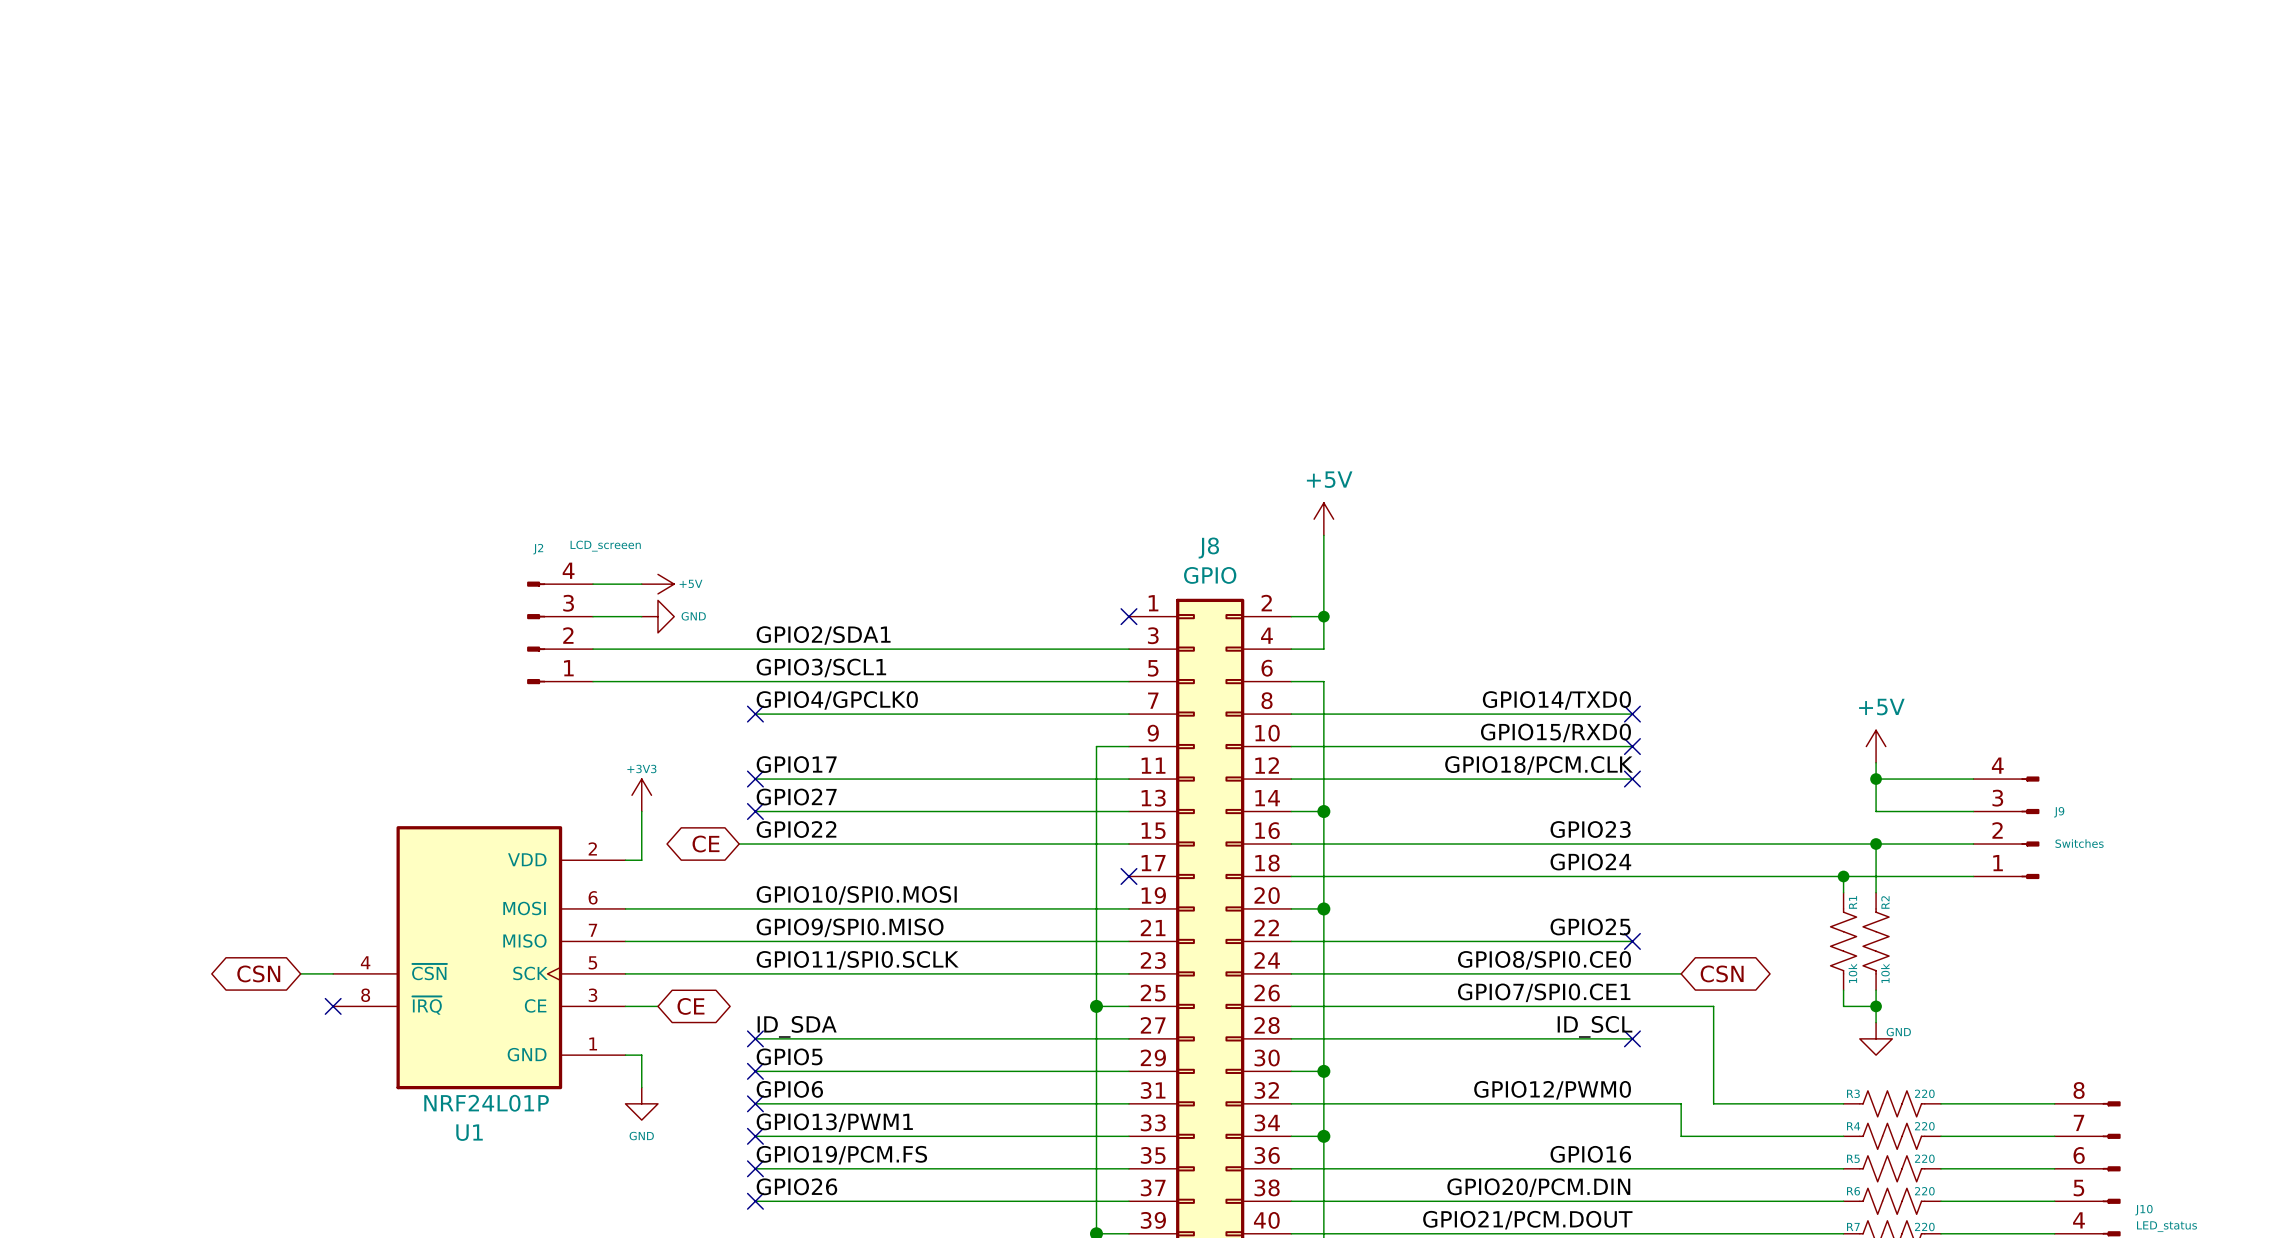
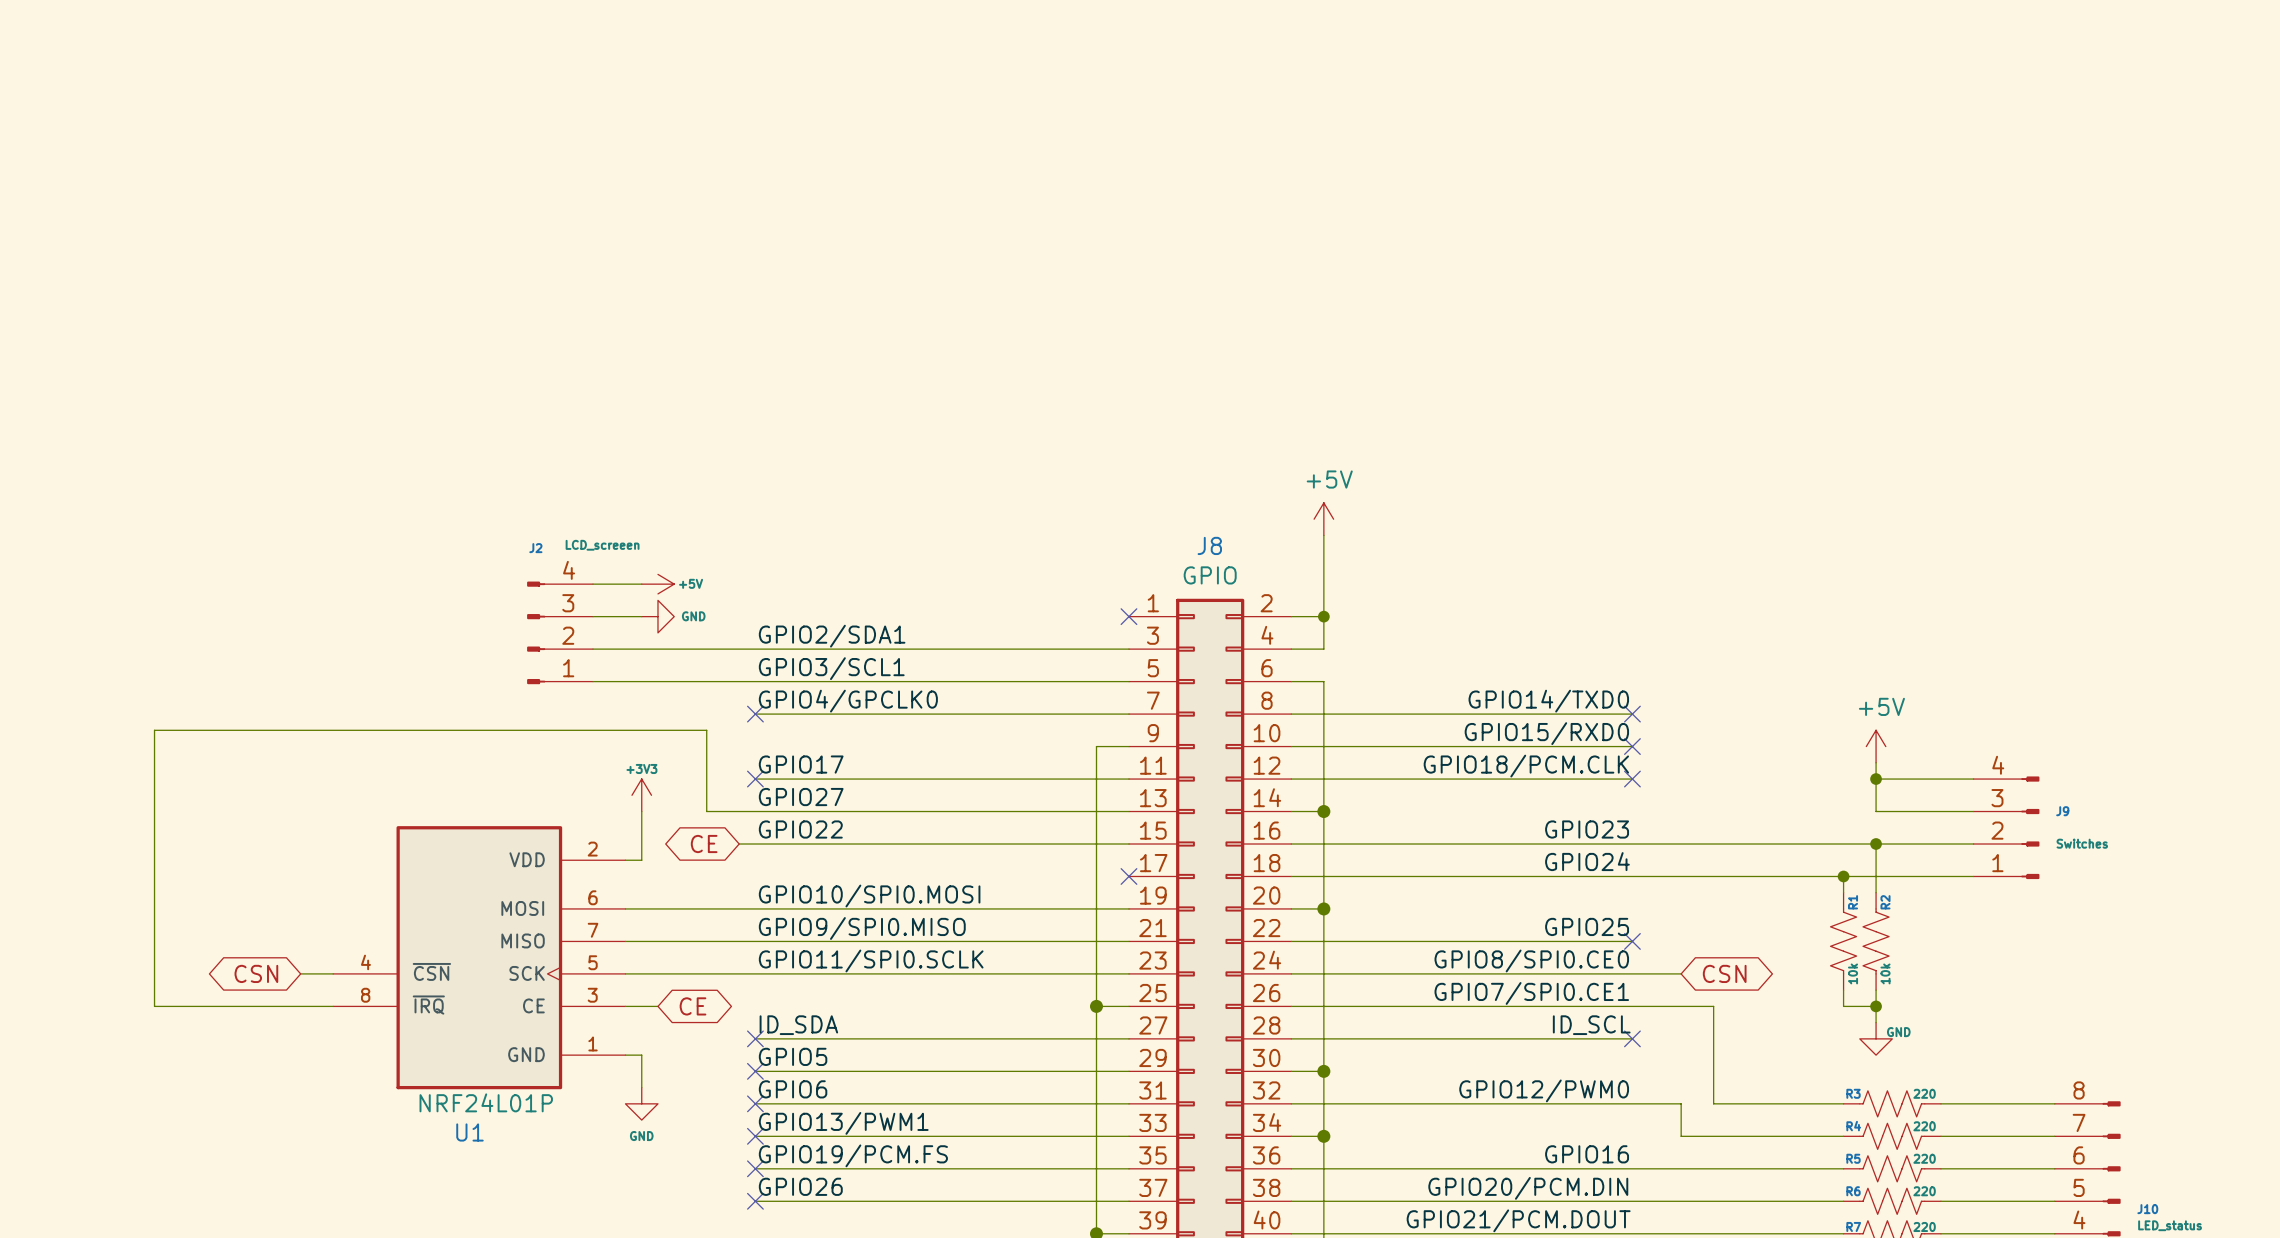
wire: none -> (755, 811) (706, 811) (706, 730) (154, 730) (154, 1006) (333, 1006)
no-connect mark: (755, 811) -> none
no-connect mark: (333, 1006) -> none

